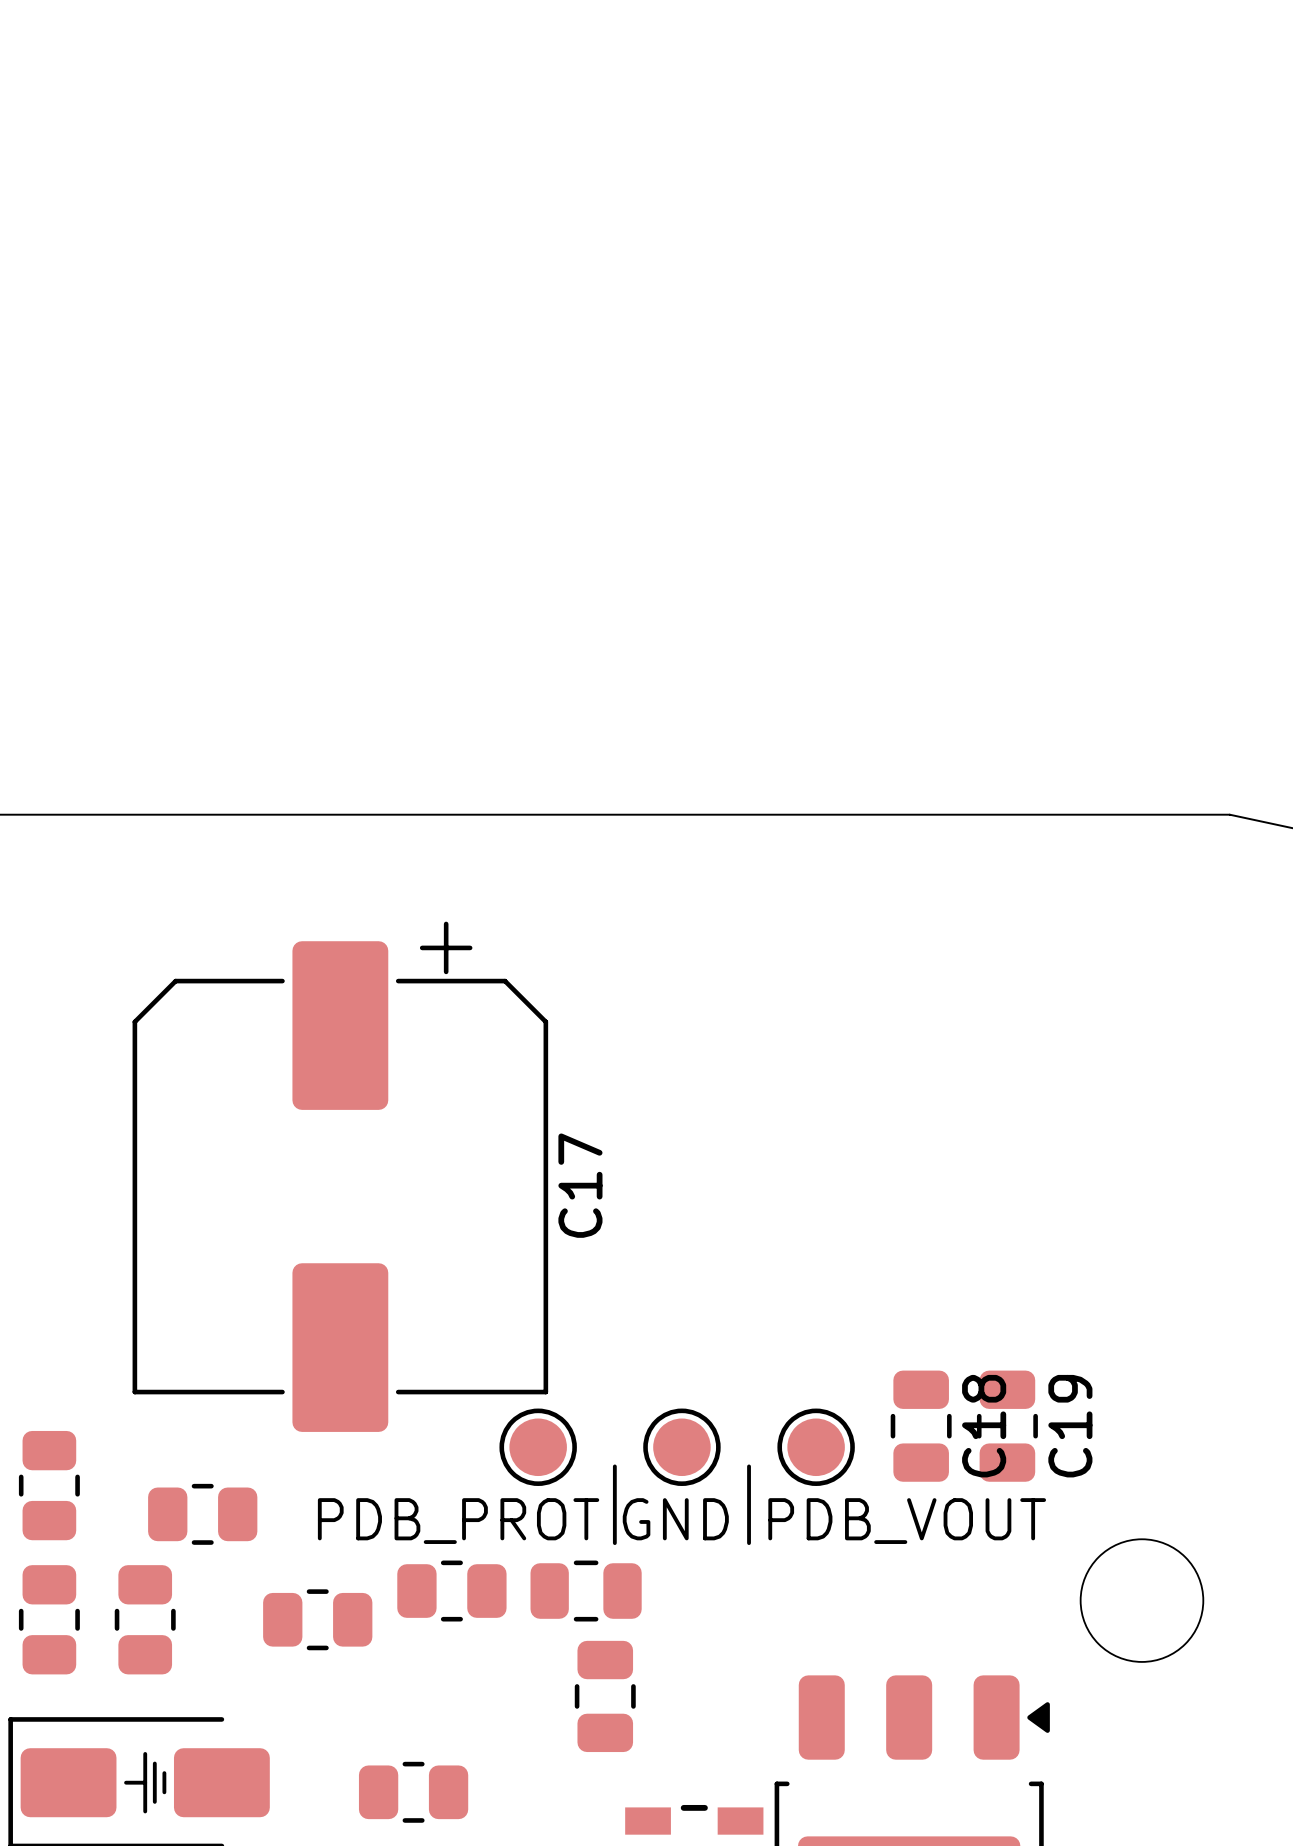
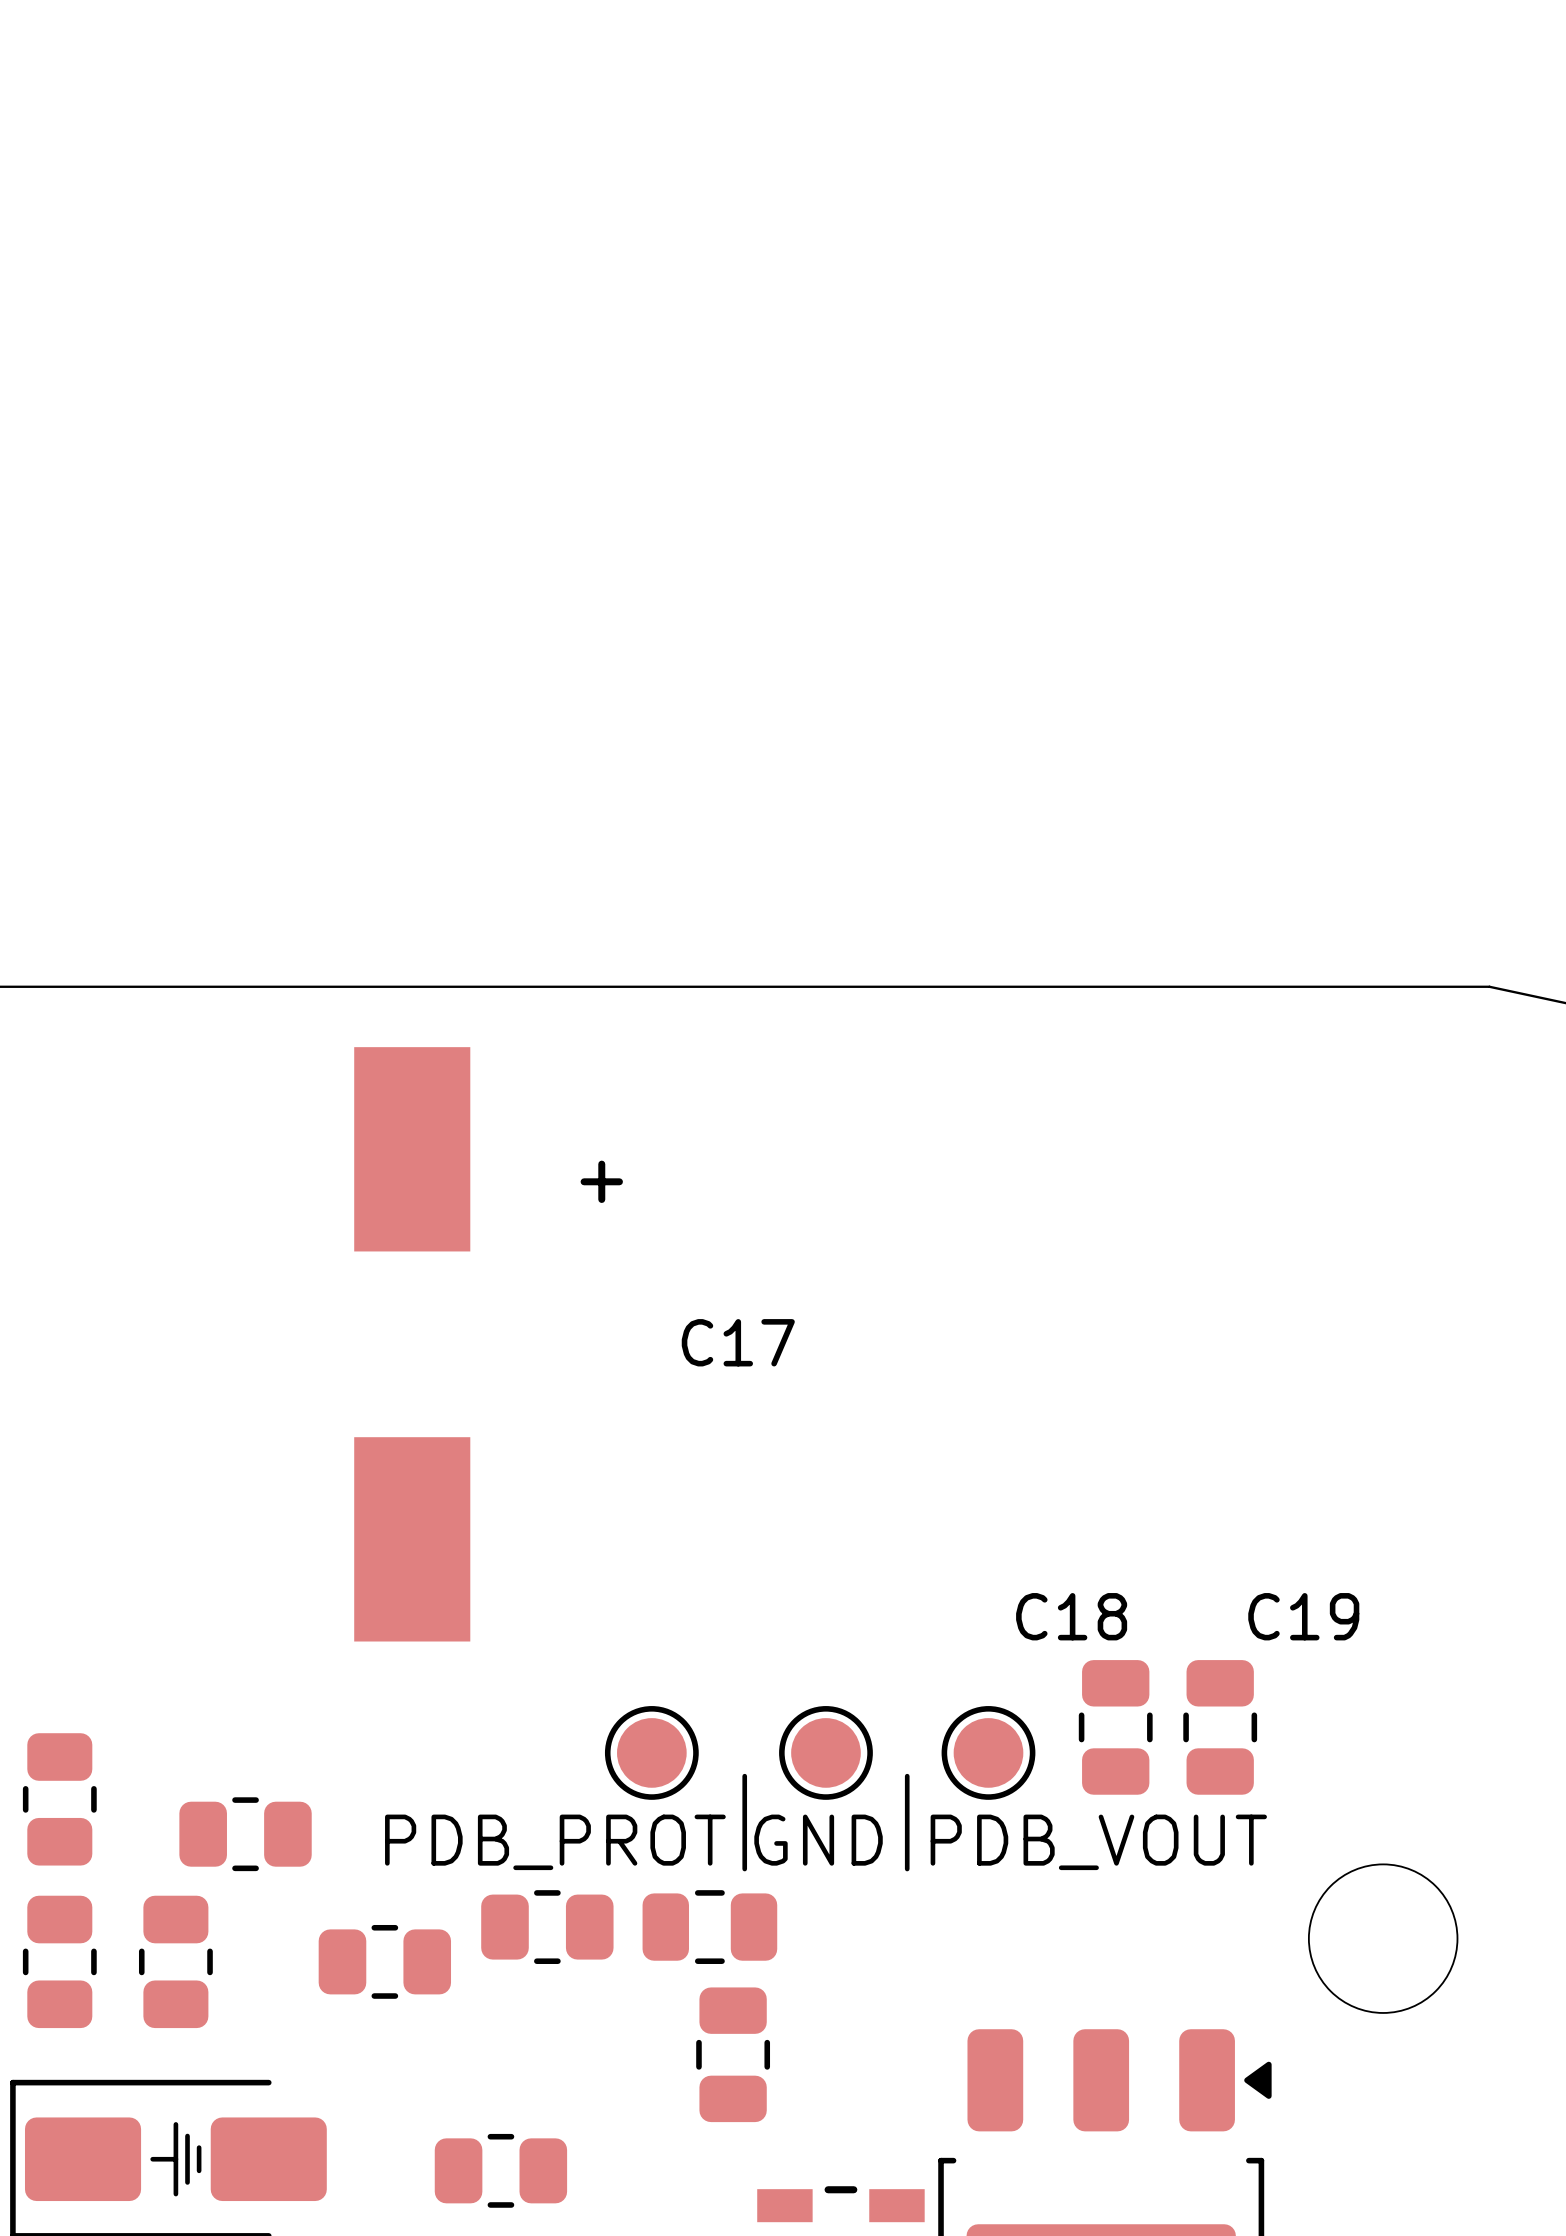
C17 footprint: [132, 921, 549, 1432] -> [354, 1047, 471, 1642]
C18 name rotation: 0° (984, 1426) -> 90° clockwise (1071, 1616)
C18 name position: C18 (984, 1426) -> C18 (1071, 1616)
C19 name rotation: 0° (1070, 1426) -> 90° clockwise (1303, 1616)

